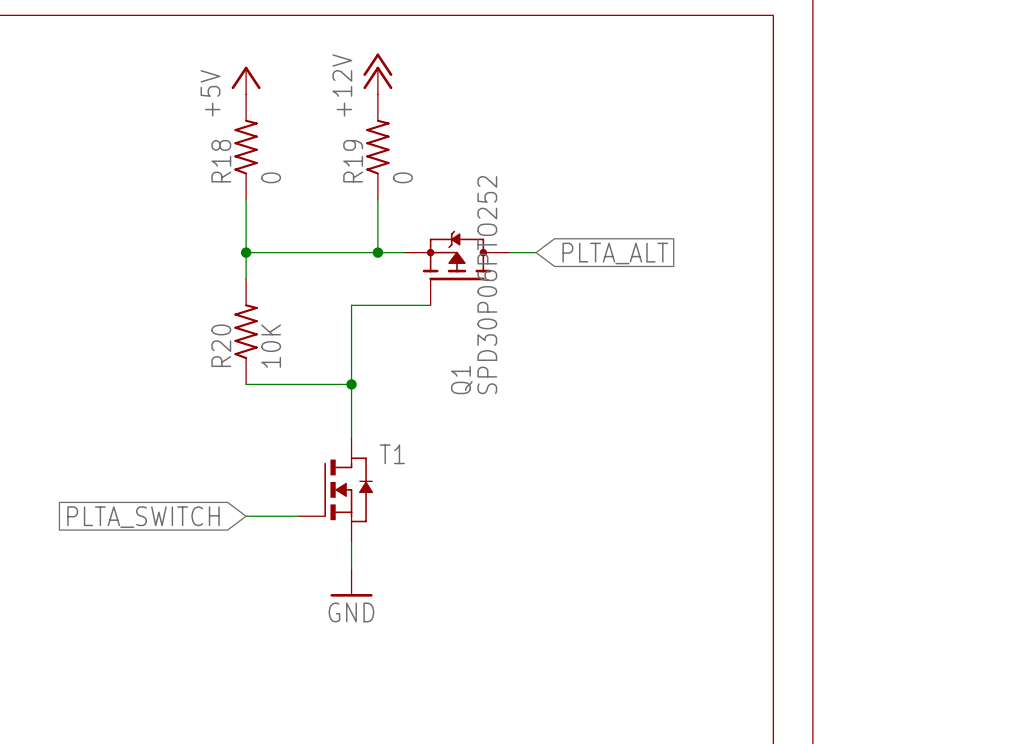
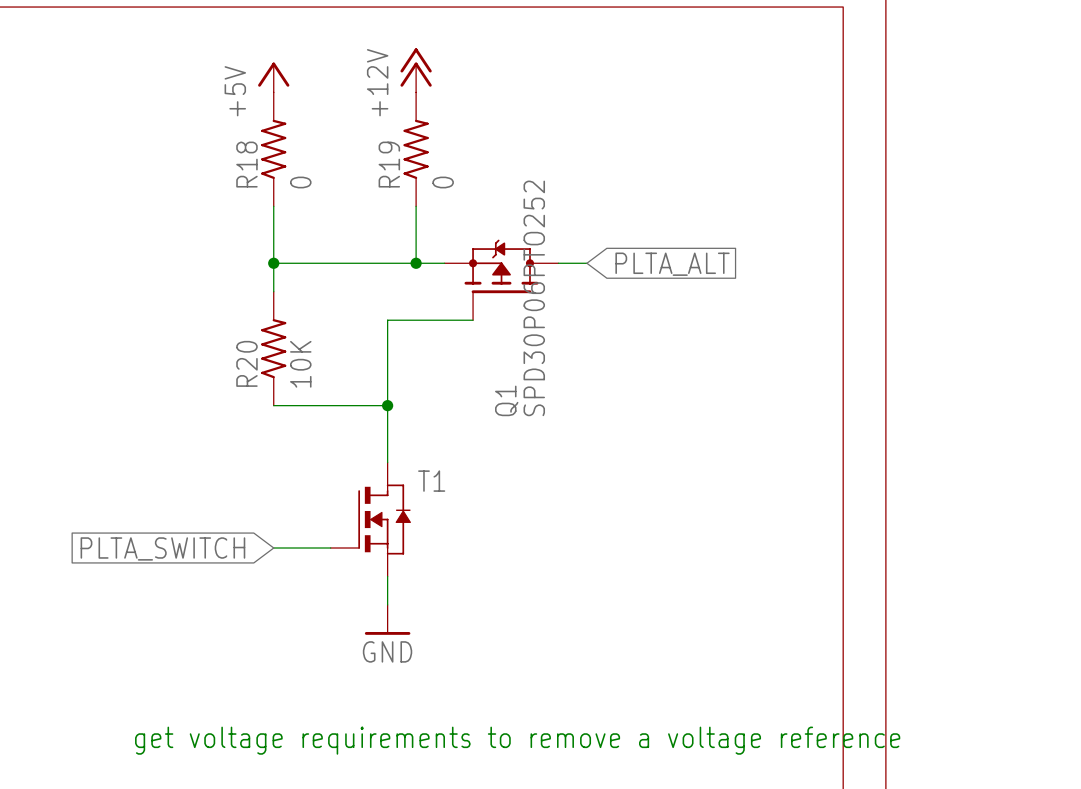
text: none -> get voltage requirements to remove a voltage reference (517, 740)

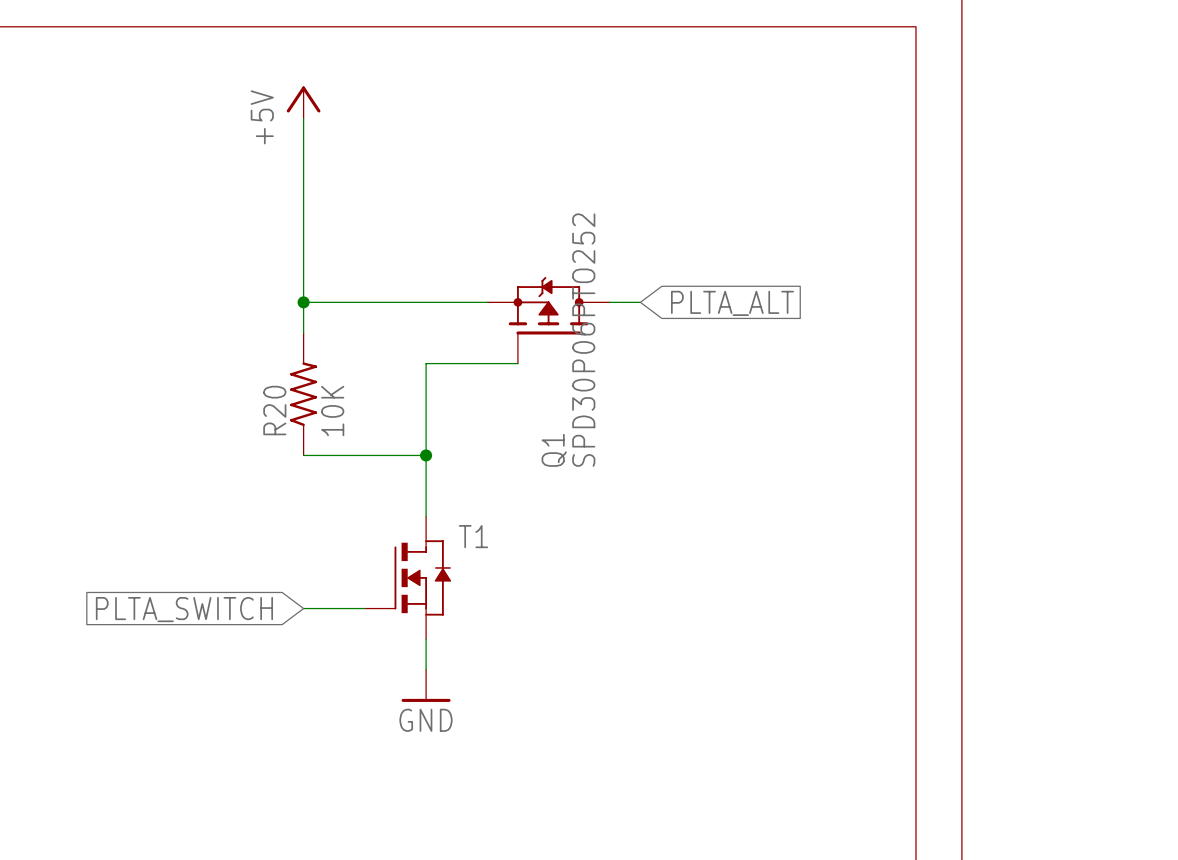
power symbol: +12V (416, 70) -> none
R18: 0 (273, 149) -> none
R19: 0 (416, 149) -> none
wire: (416, 206) (416, 263) -> none
junction: (416, 263) -> none
text: get voltage requirements to remove a voltage reference (517, 740) -> none

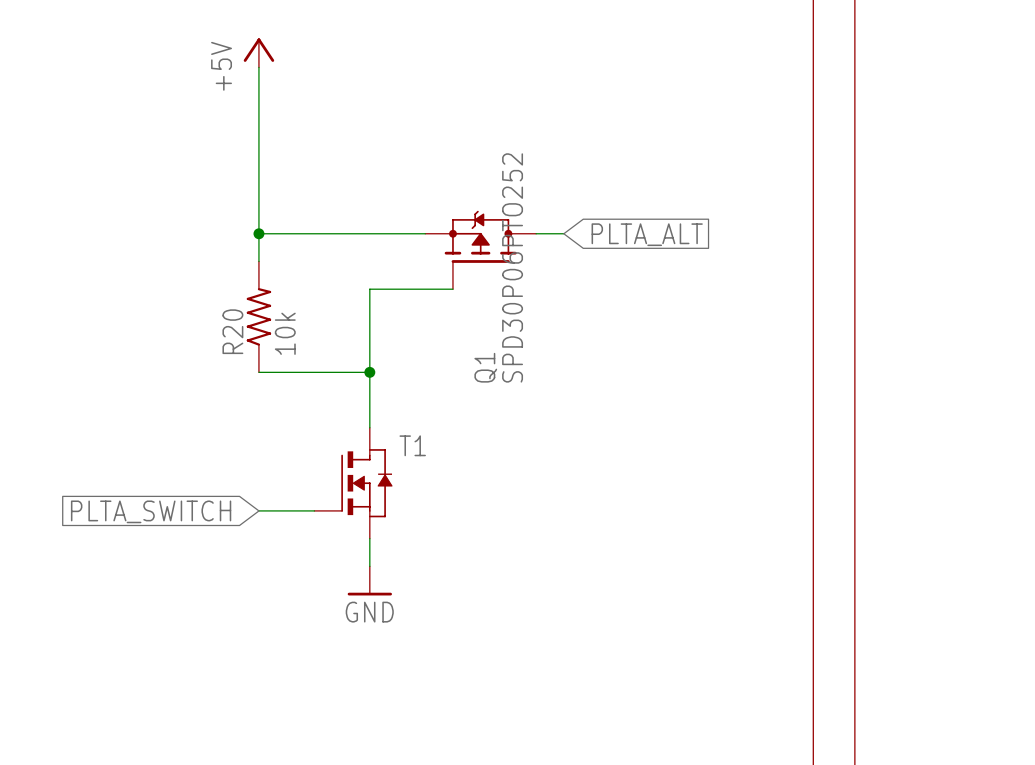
R20 value: 10K (332, 411) -> 10k (285, 333)

